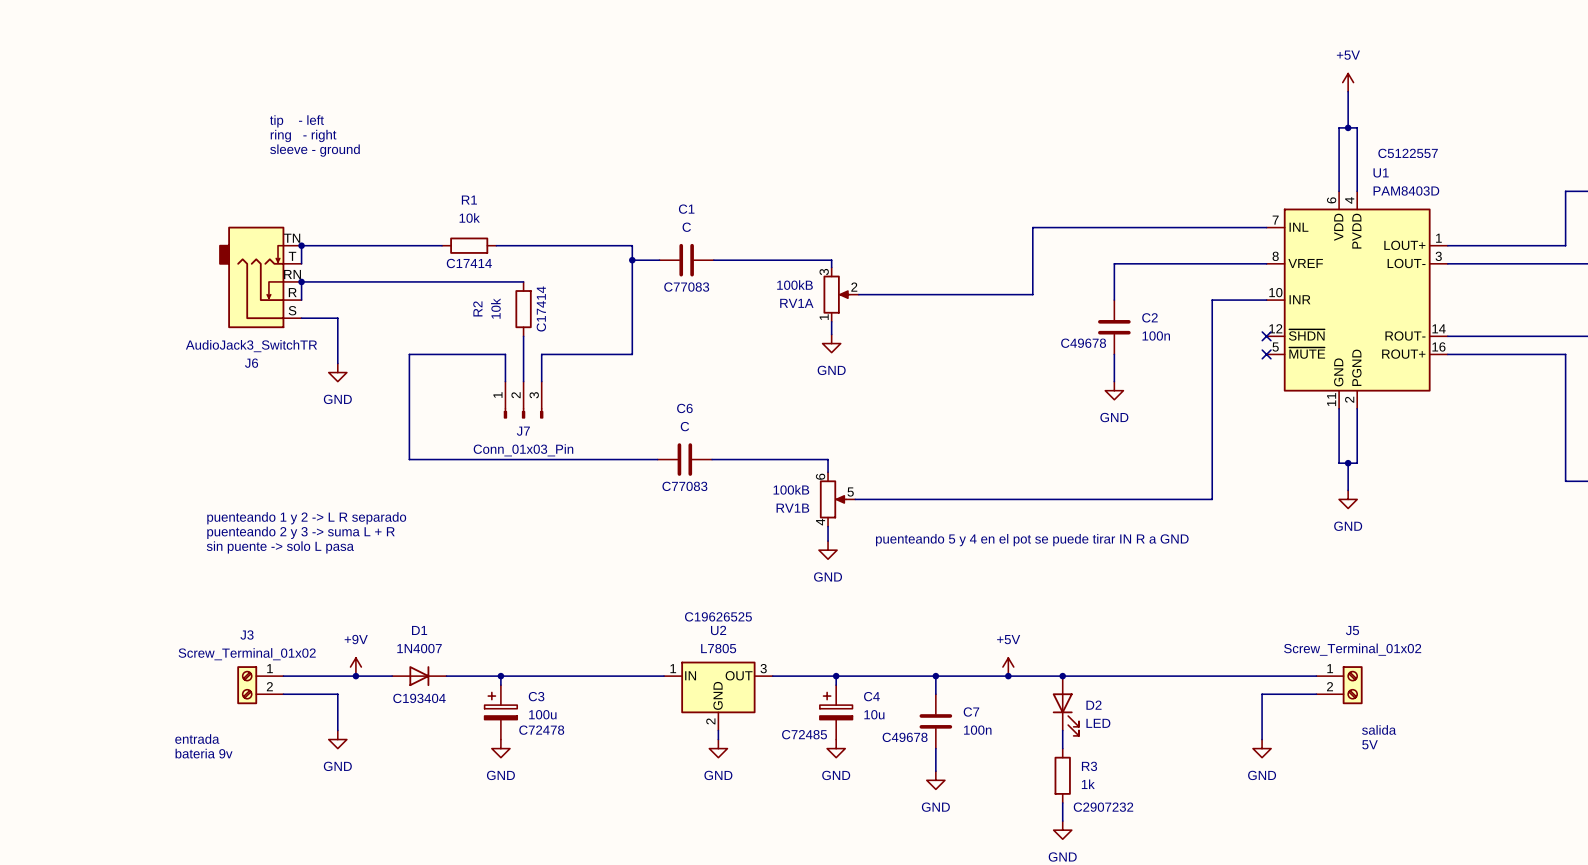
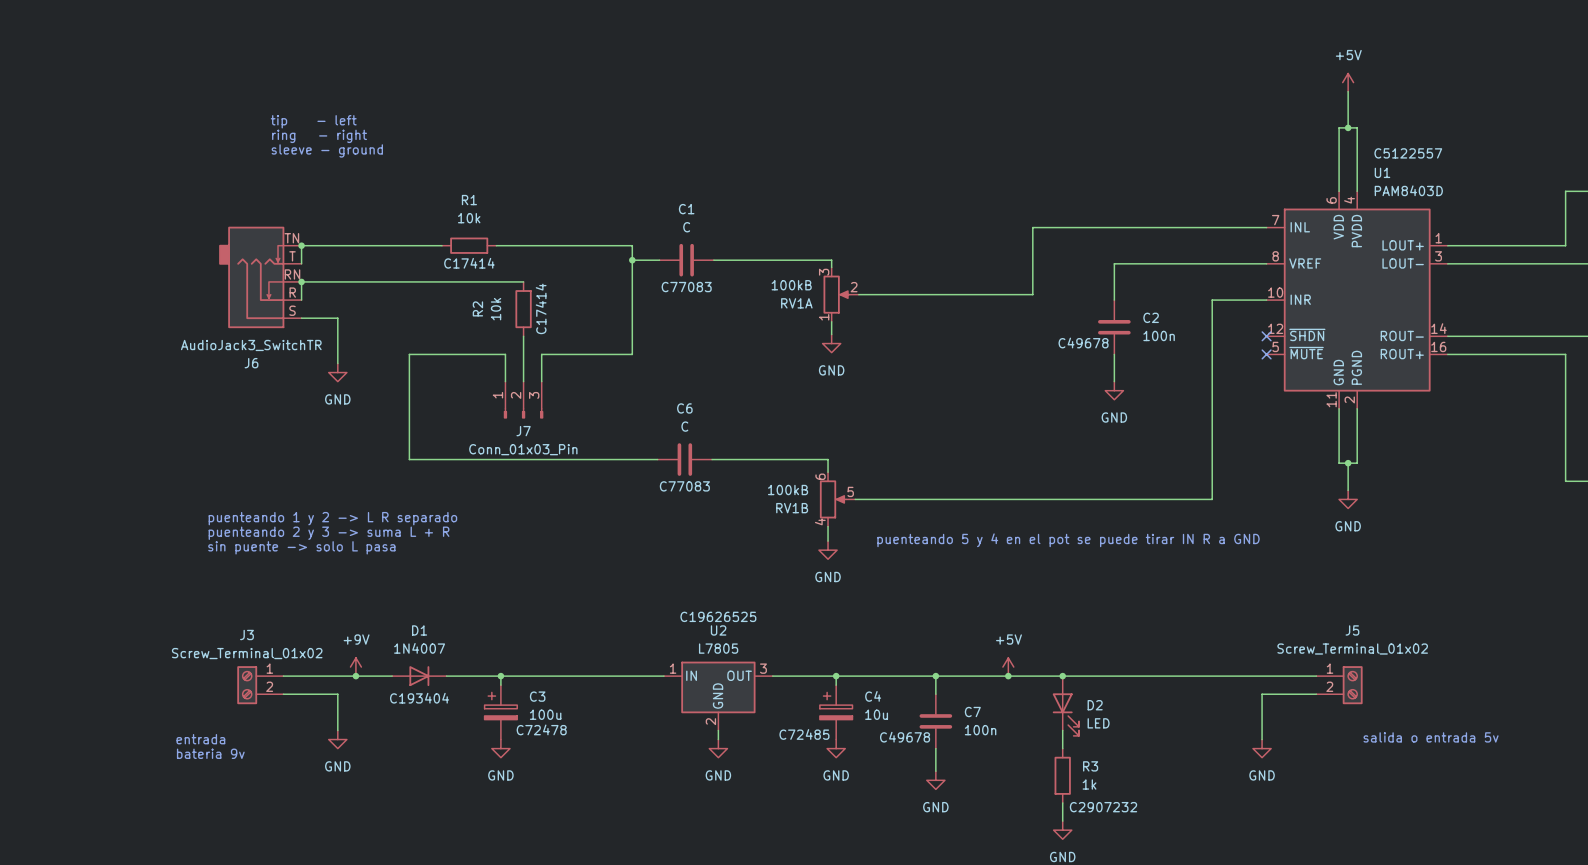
text: salida (1379, 729) -> none
text: none -> salida o entrada 5v (1431, 737)
text: 5V (1370, 744) -> none

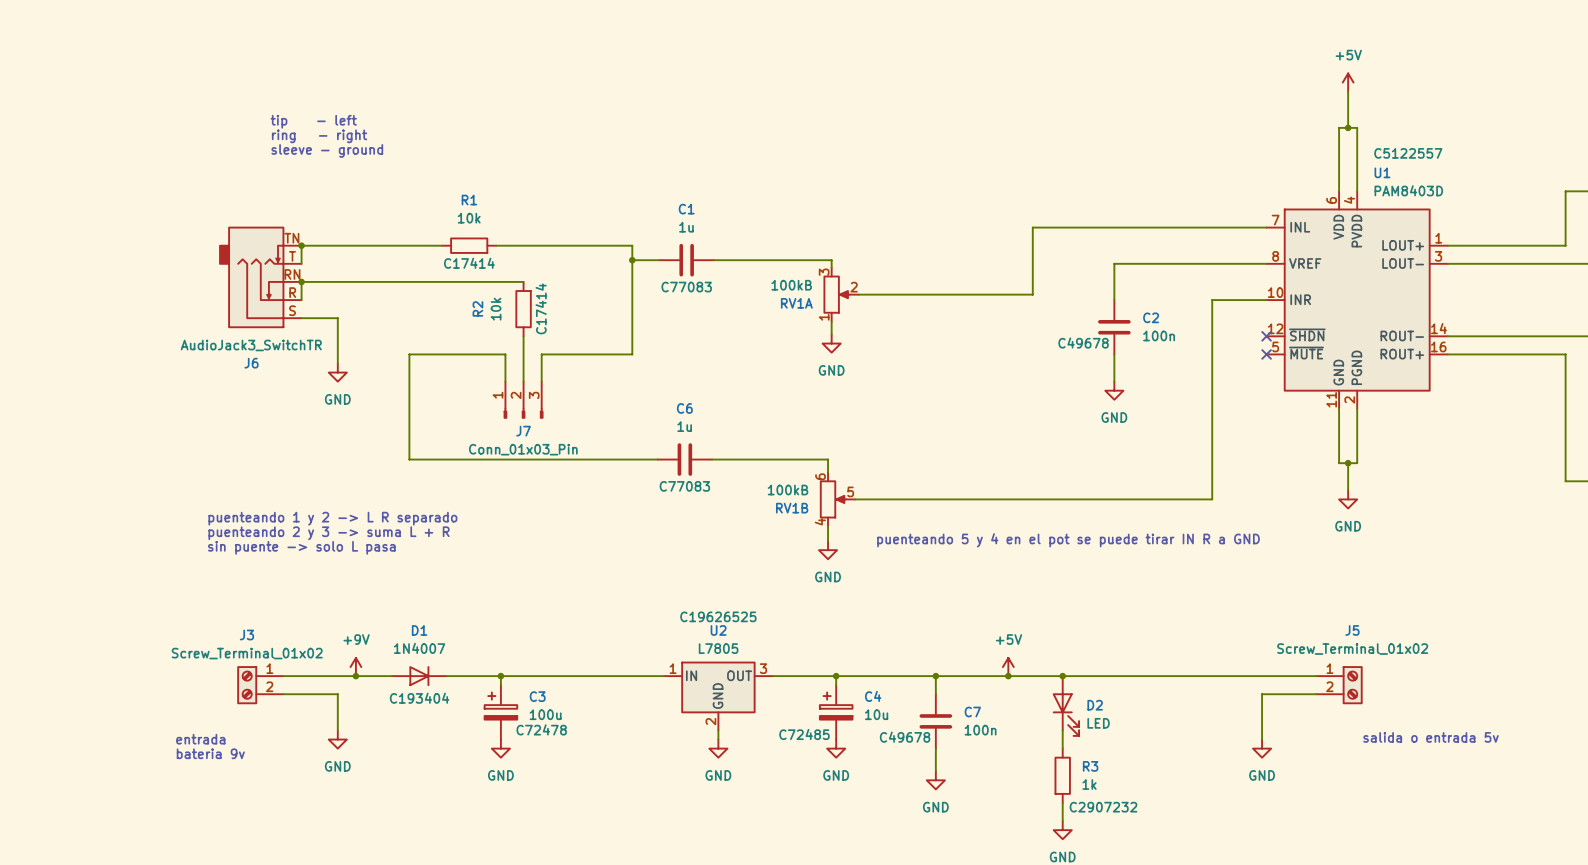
C1 value: C (686, 227) -> 1u (686, 227)
C6 value: C (684, 426) -> 1u (684, 426)

